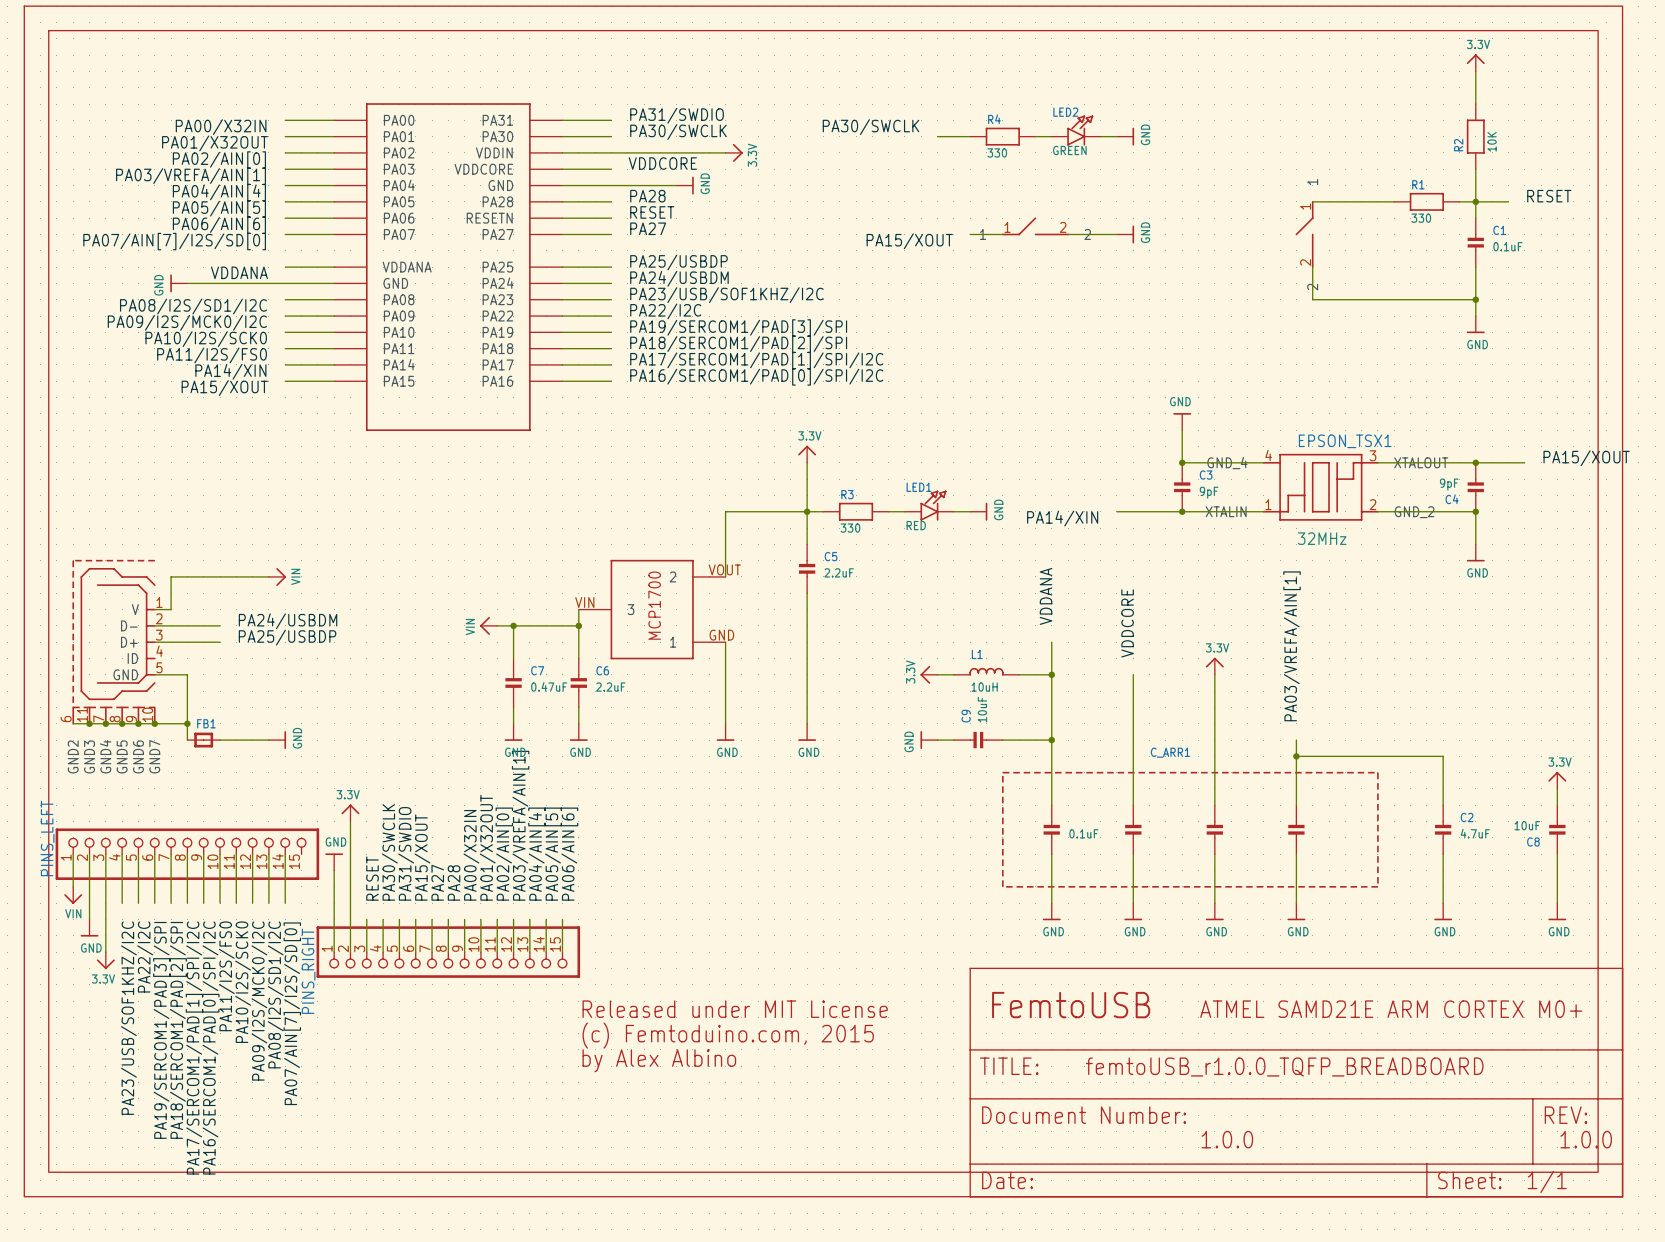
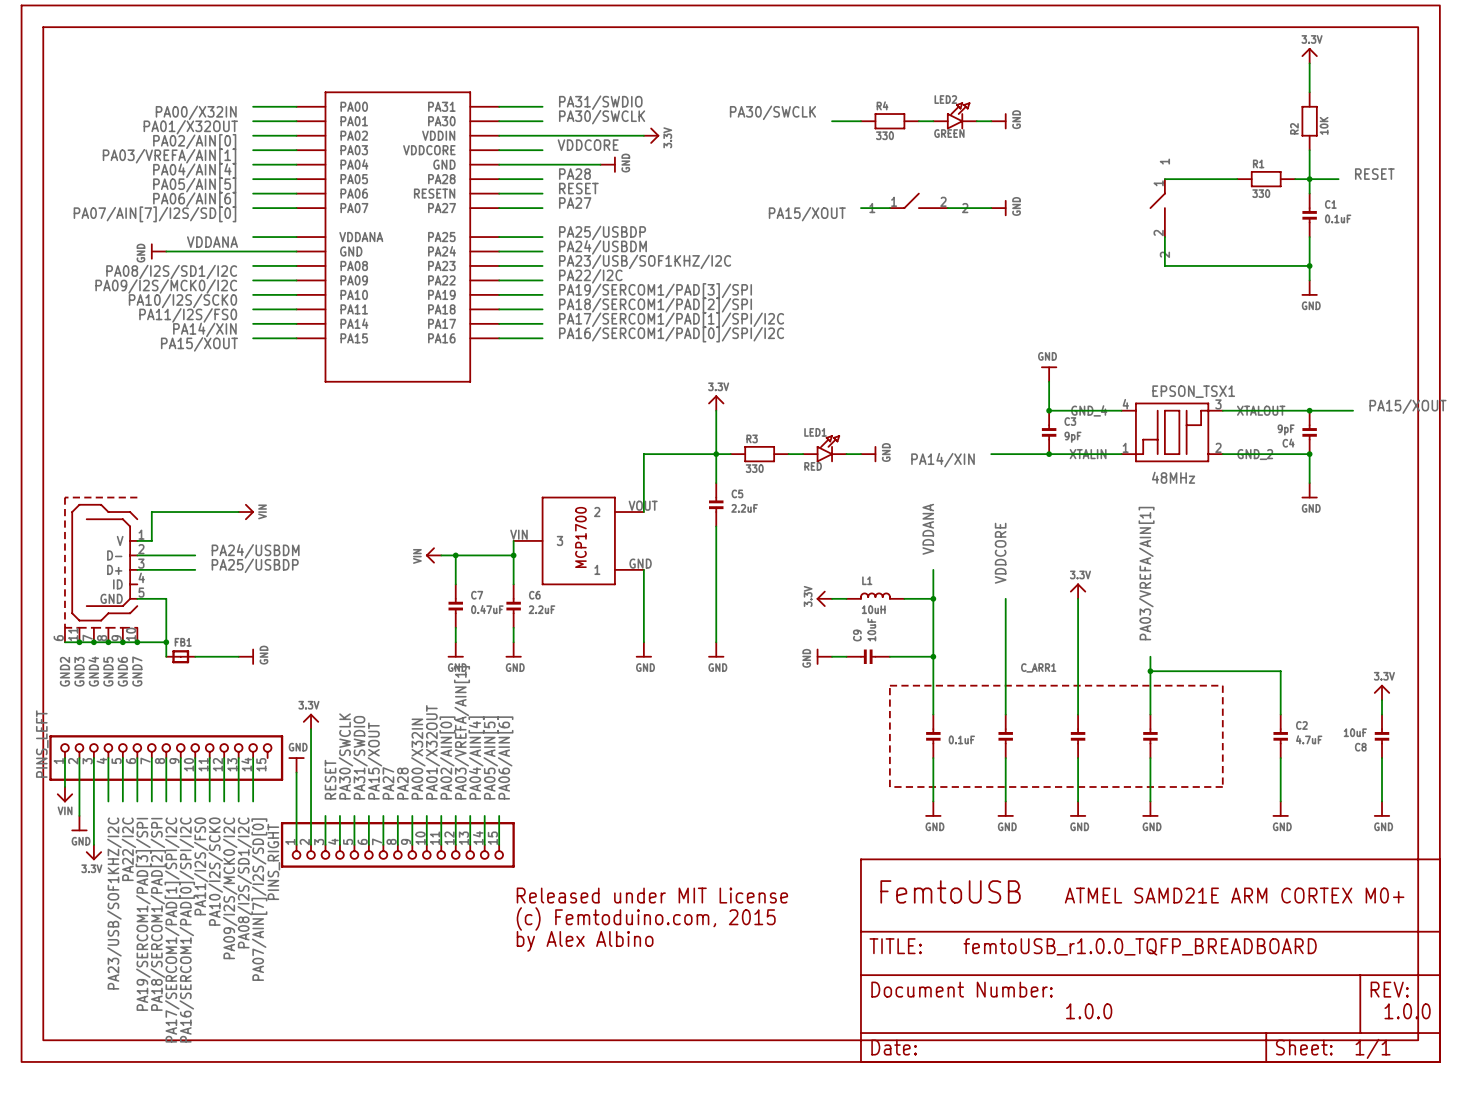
EPSON_TSX1 value: 32MHz (1322, 538) -> 48MHz (1173, 477)

